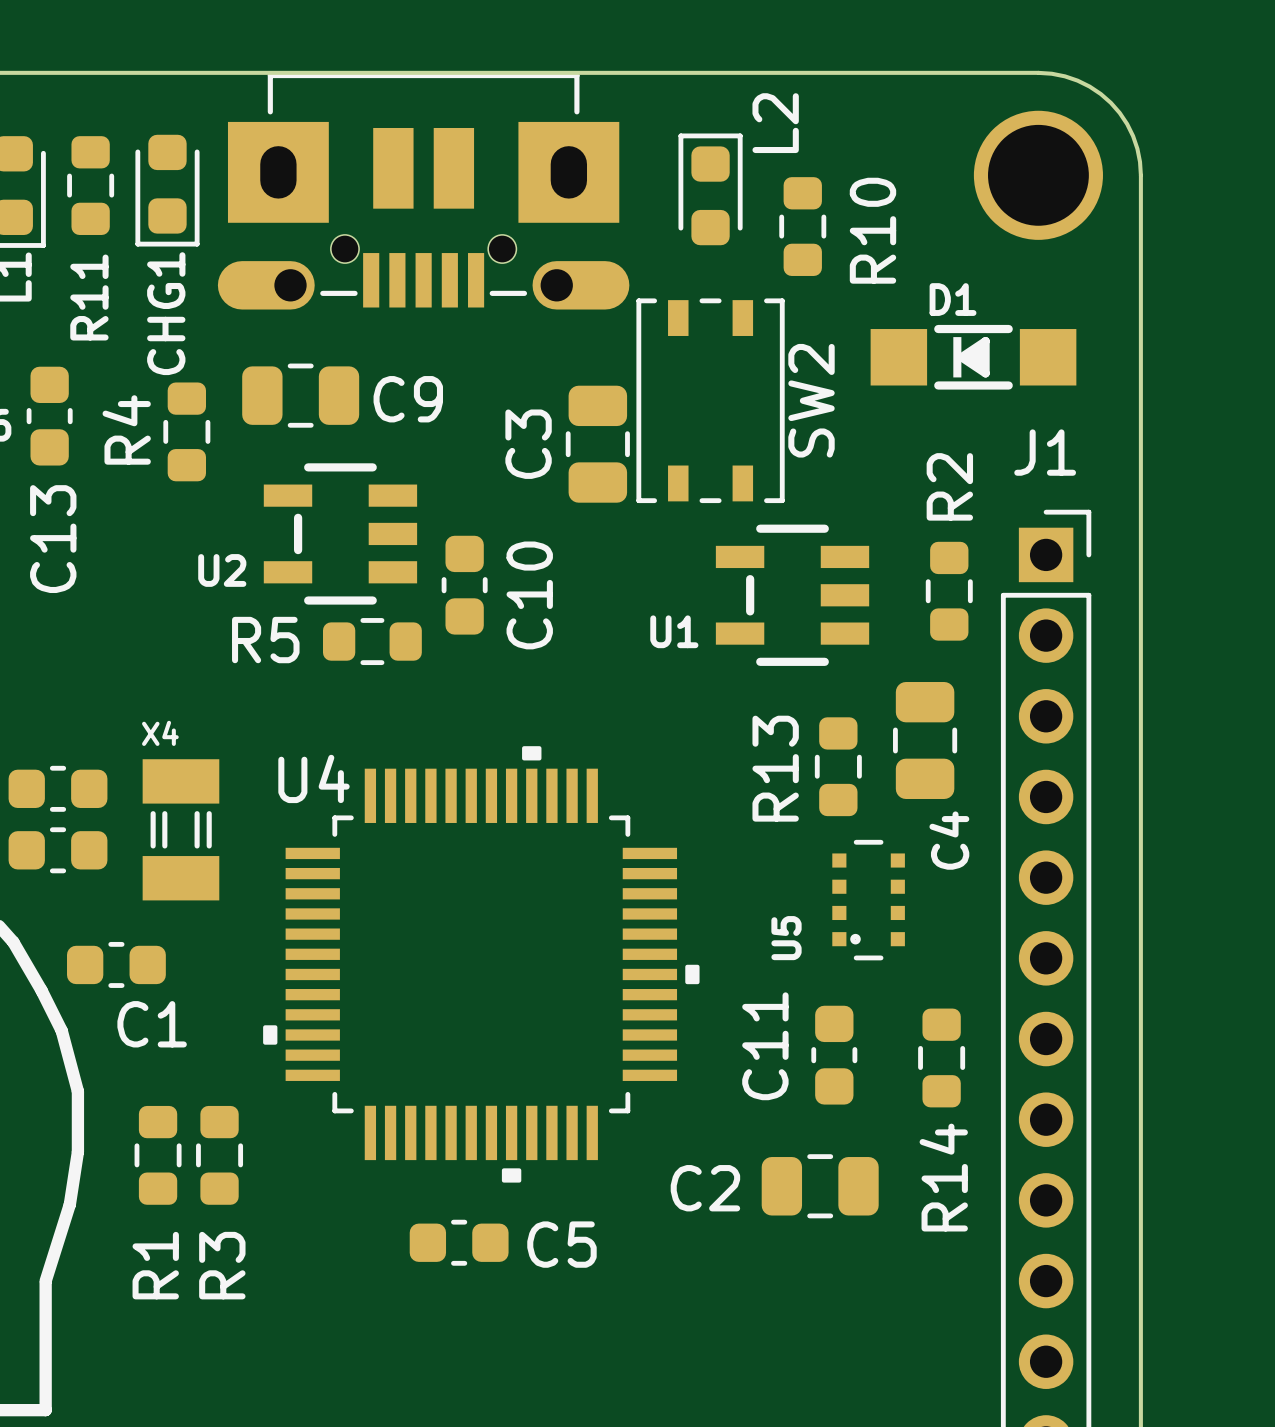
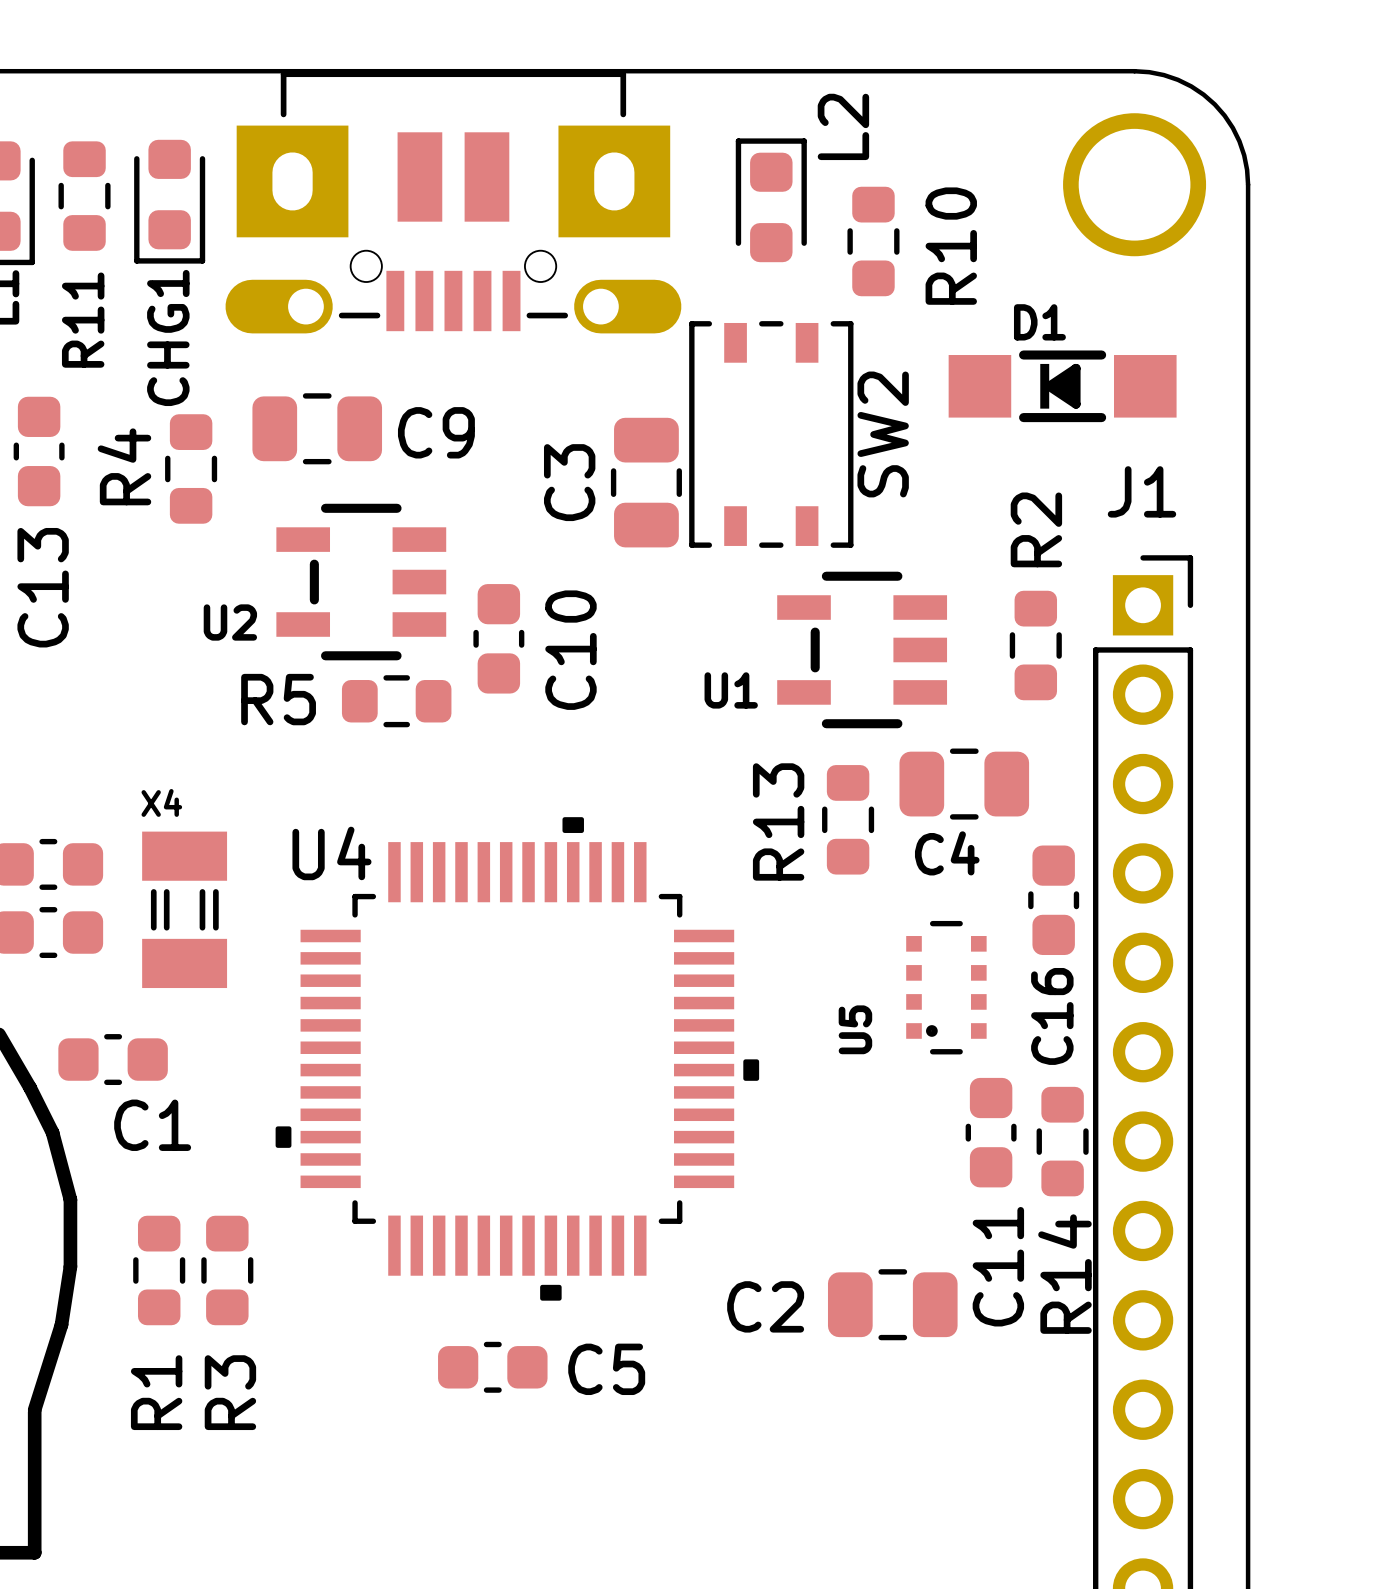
C4 rotation: 0° (925, 740) -> 90° clockwise (964, 784)
R13 position: (838, 766) -> (848, 819)
C16: none -> (1053, 900)
C11 name position: C11 (765, 1046) -> C11 (998, 1266)
C11 position: (834, 1055) -> (991, 1132)
R14 position: (941, 1057) -> (1062, 1141)

